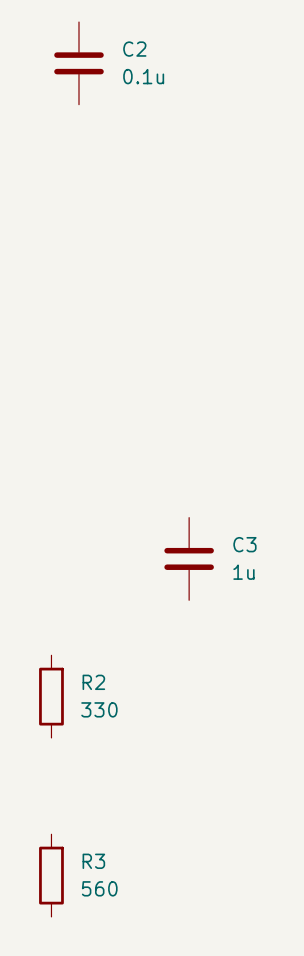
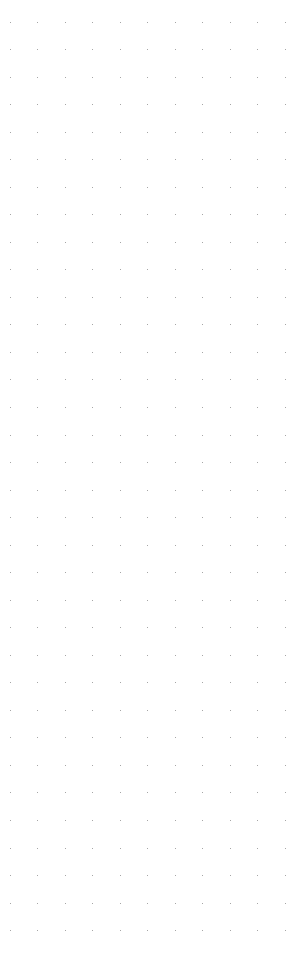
C2: 0.1u (78, 63) -> none
C3: 1u (189, 558) -> none
R2: 330 (51, 696) -> none
R3: 560 (51, 875) -> none

